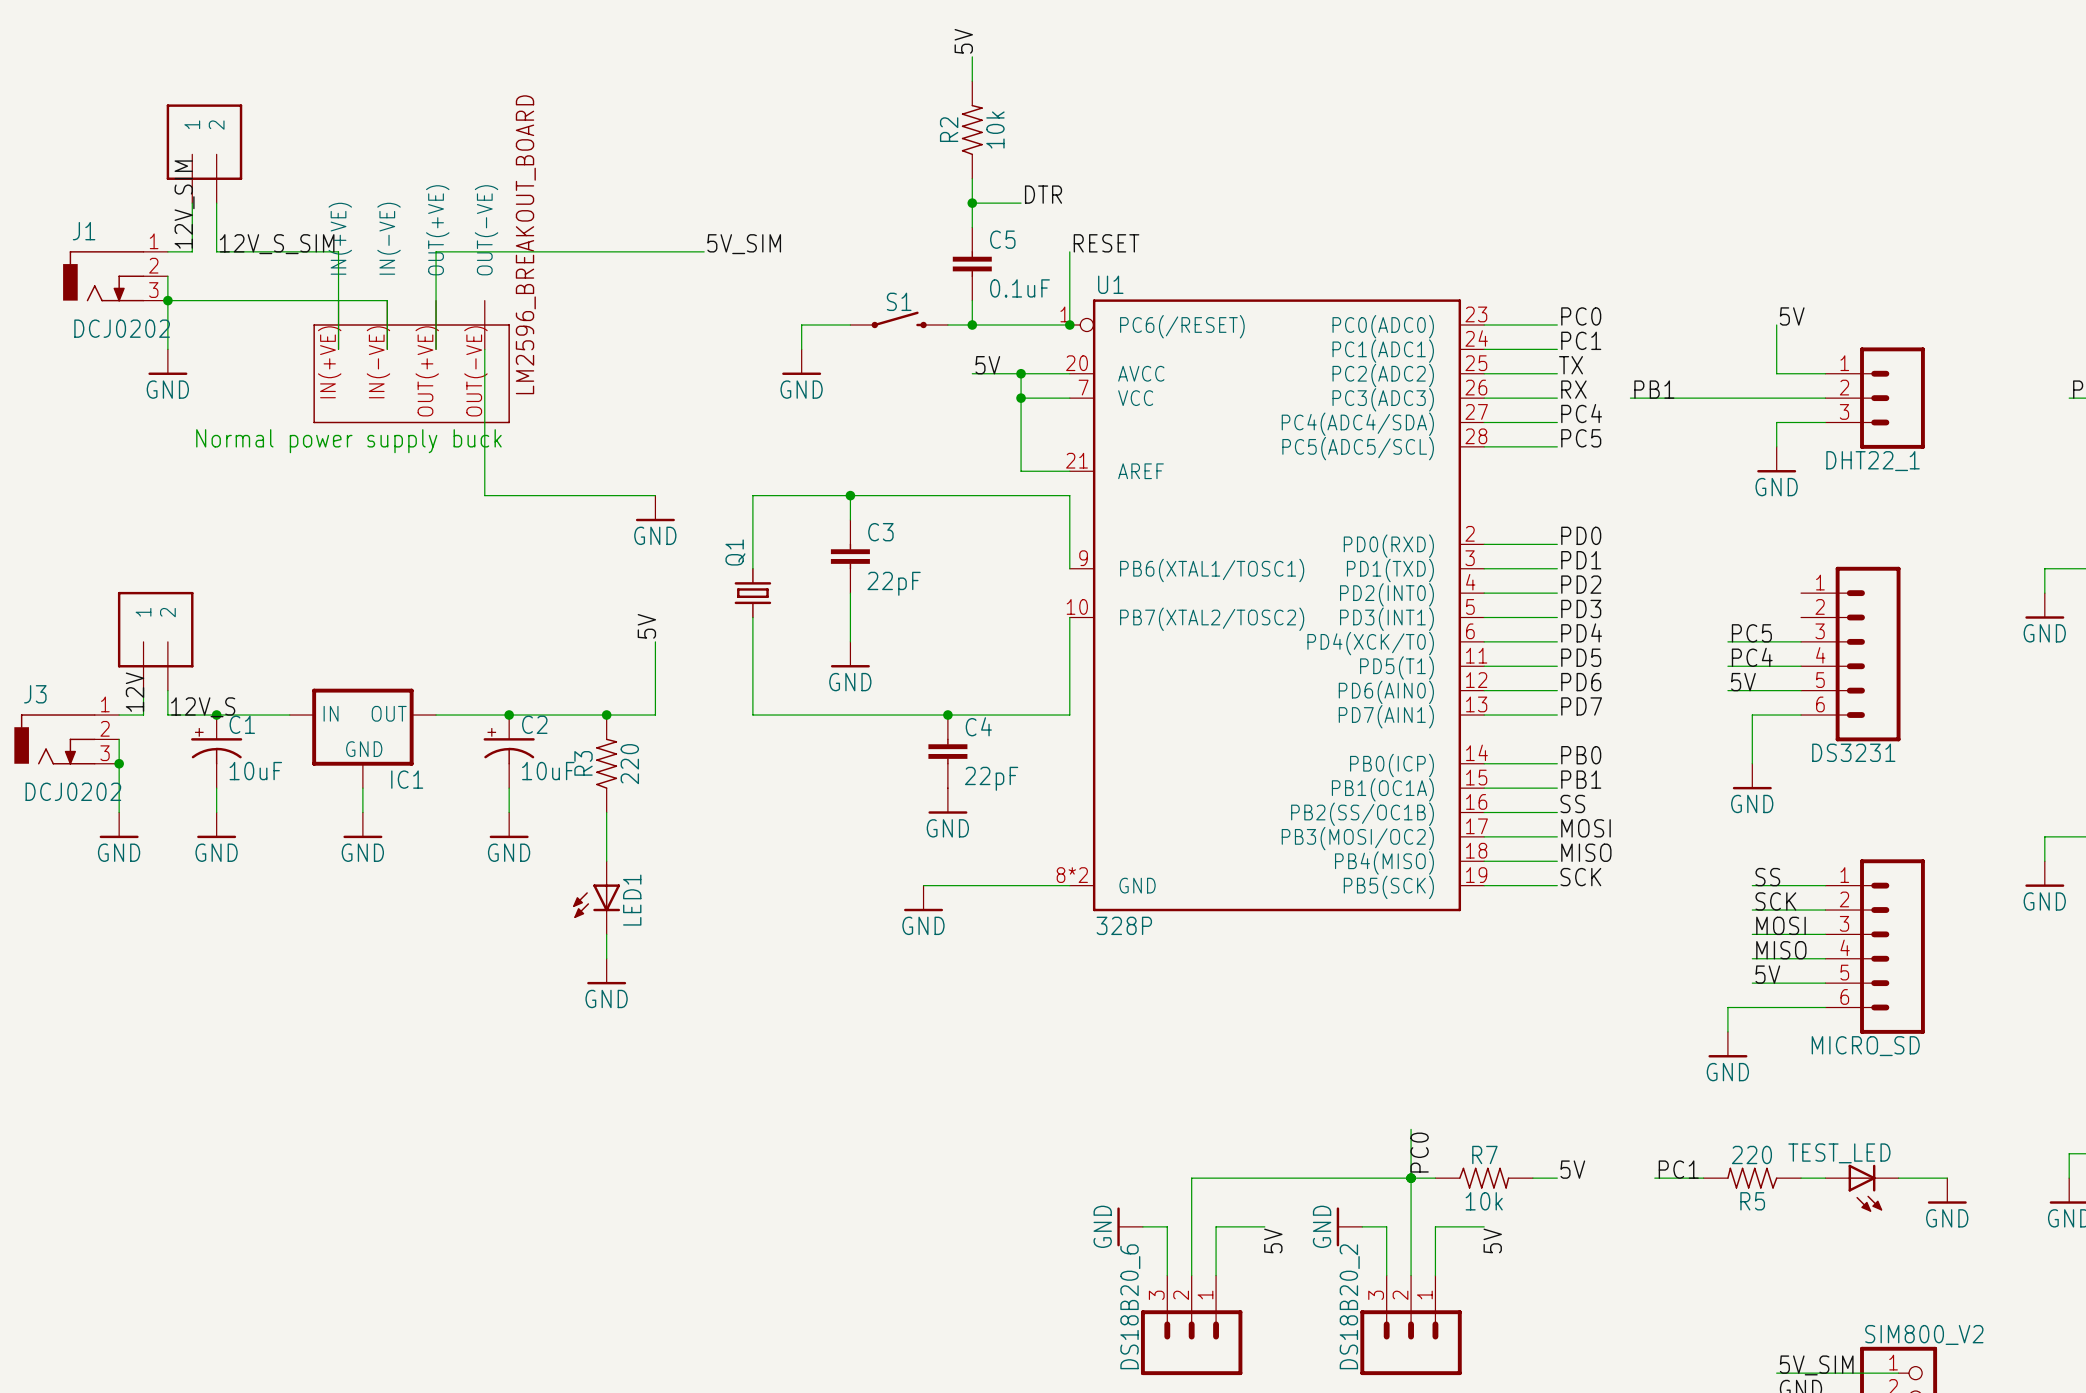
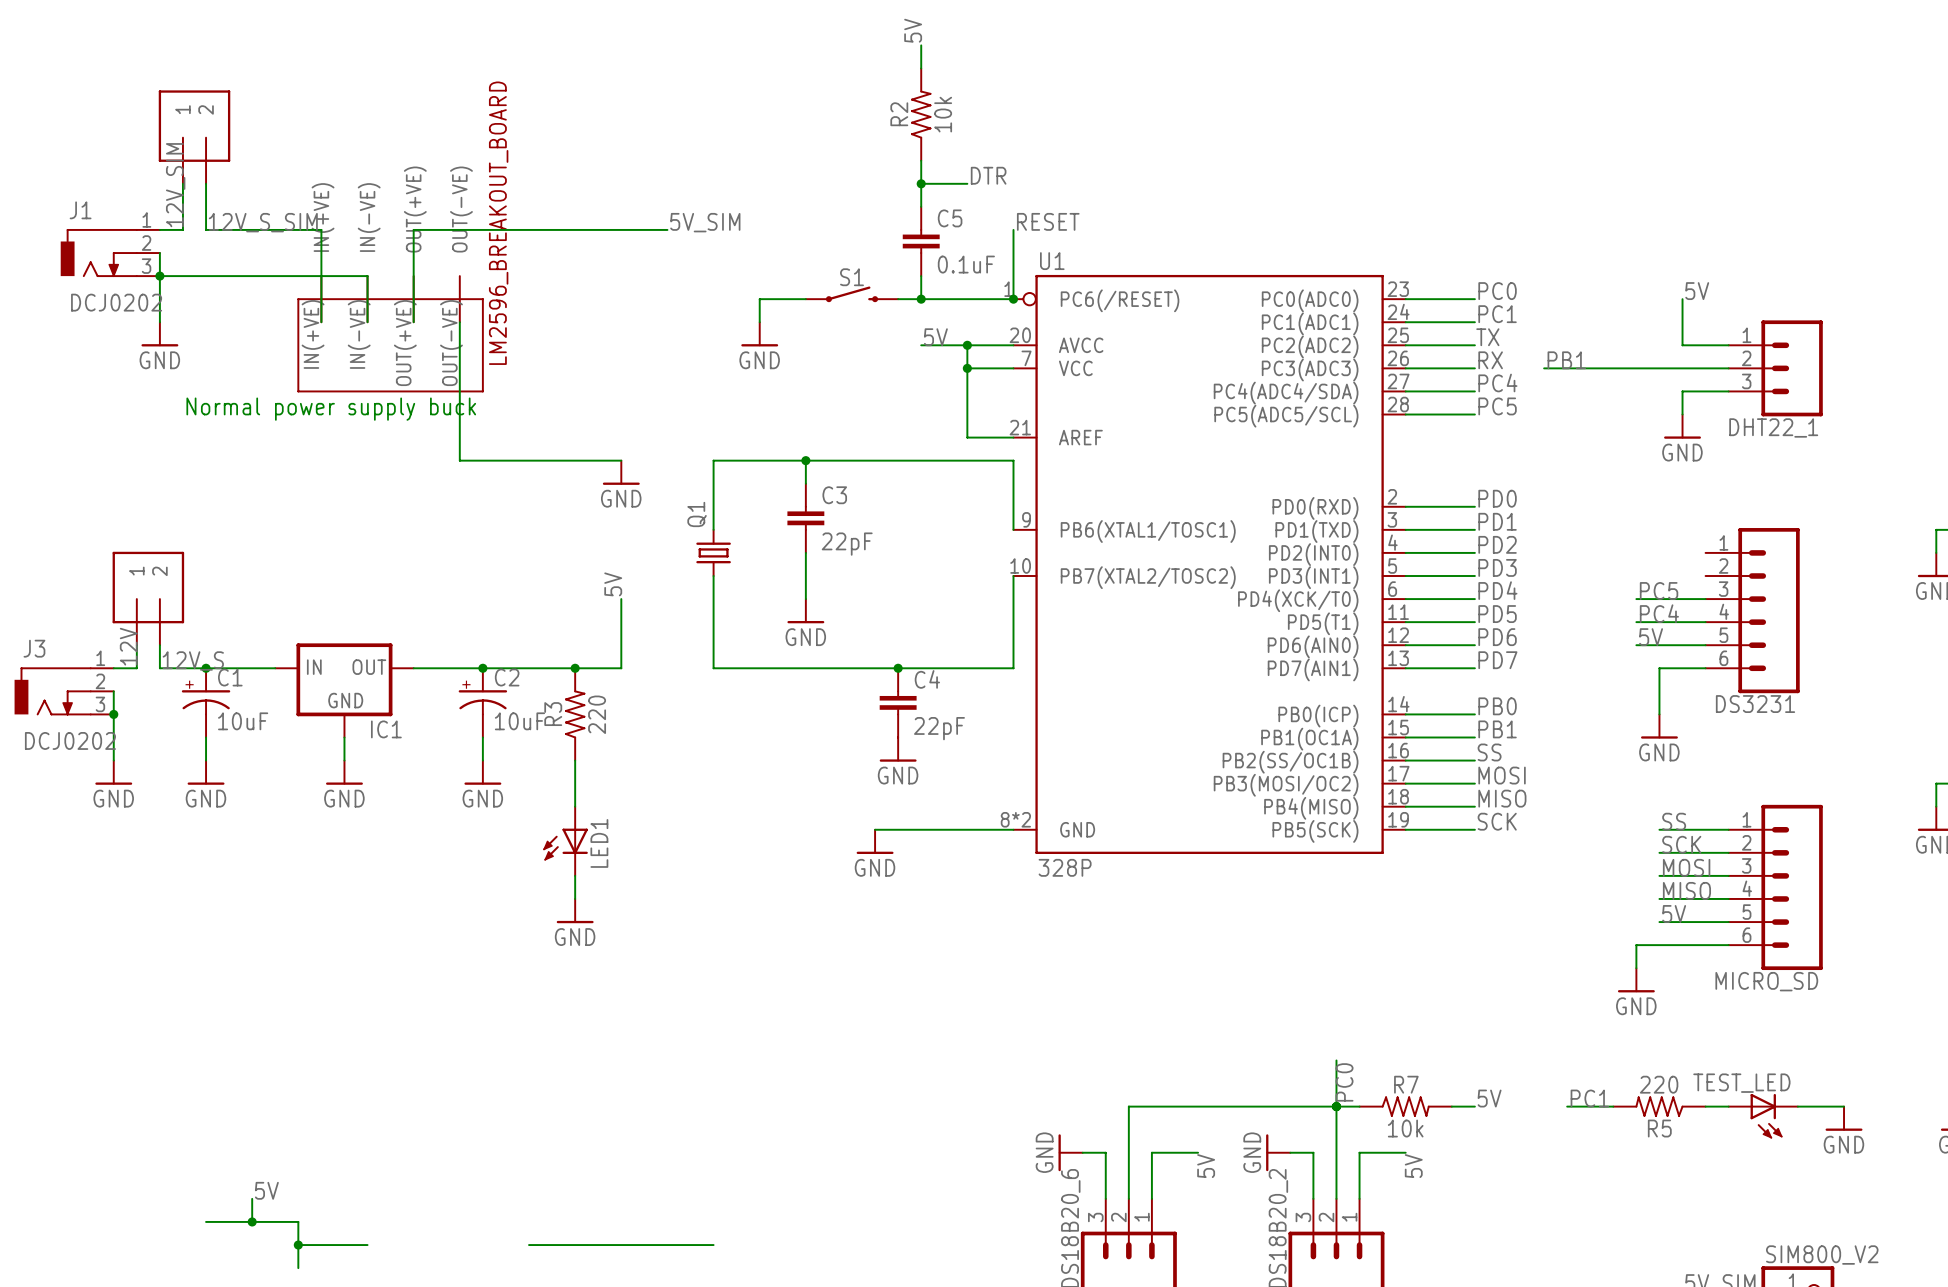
label: none -> 5V (266, 1190)
wire: none -> (252, 1198) (252, 1221)
wire: none -> (206, 1221) (298, 1221) (298, 1268)
junction: none -> (252, 1221)
wire: none -> (298, 1245) (367, 1245)
junction: none -> (298, 1245)
wire: none -> (529, 1245) (713, 1245)

